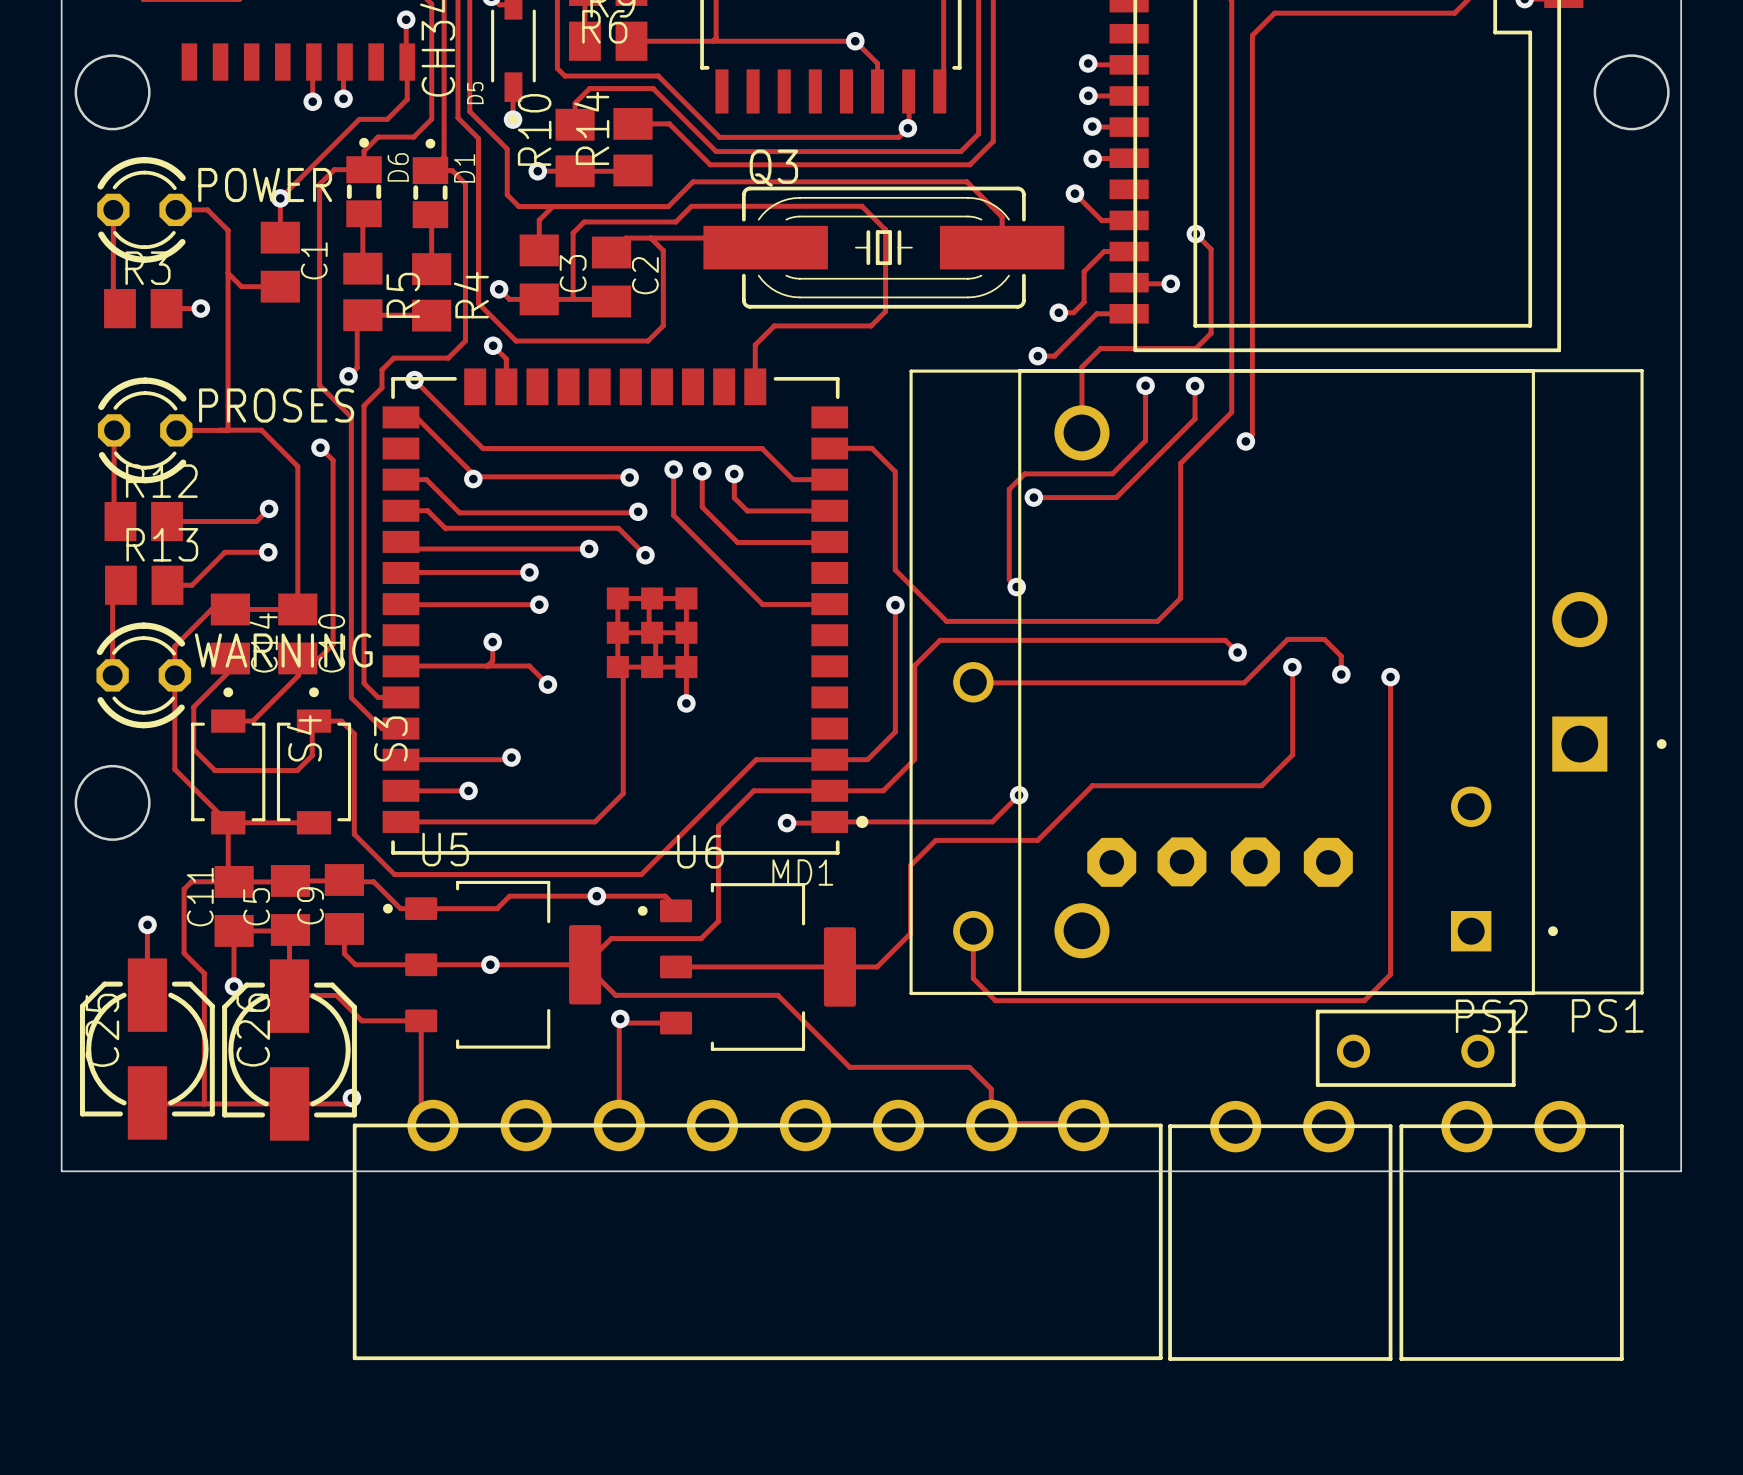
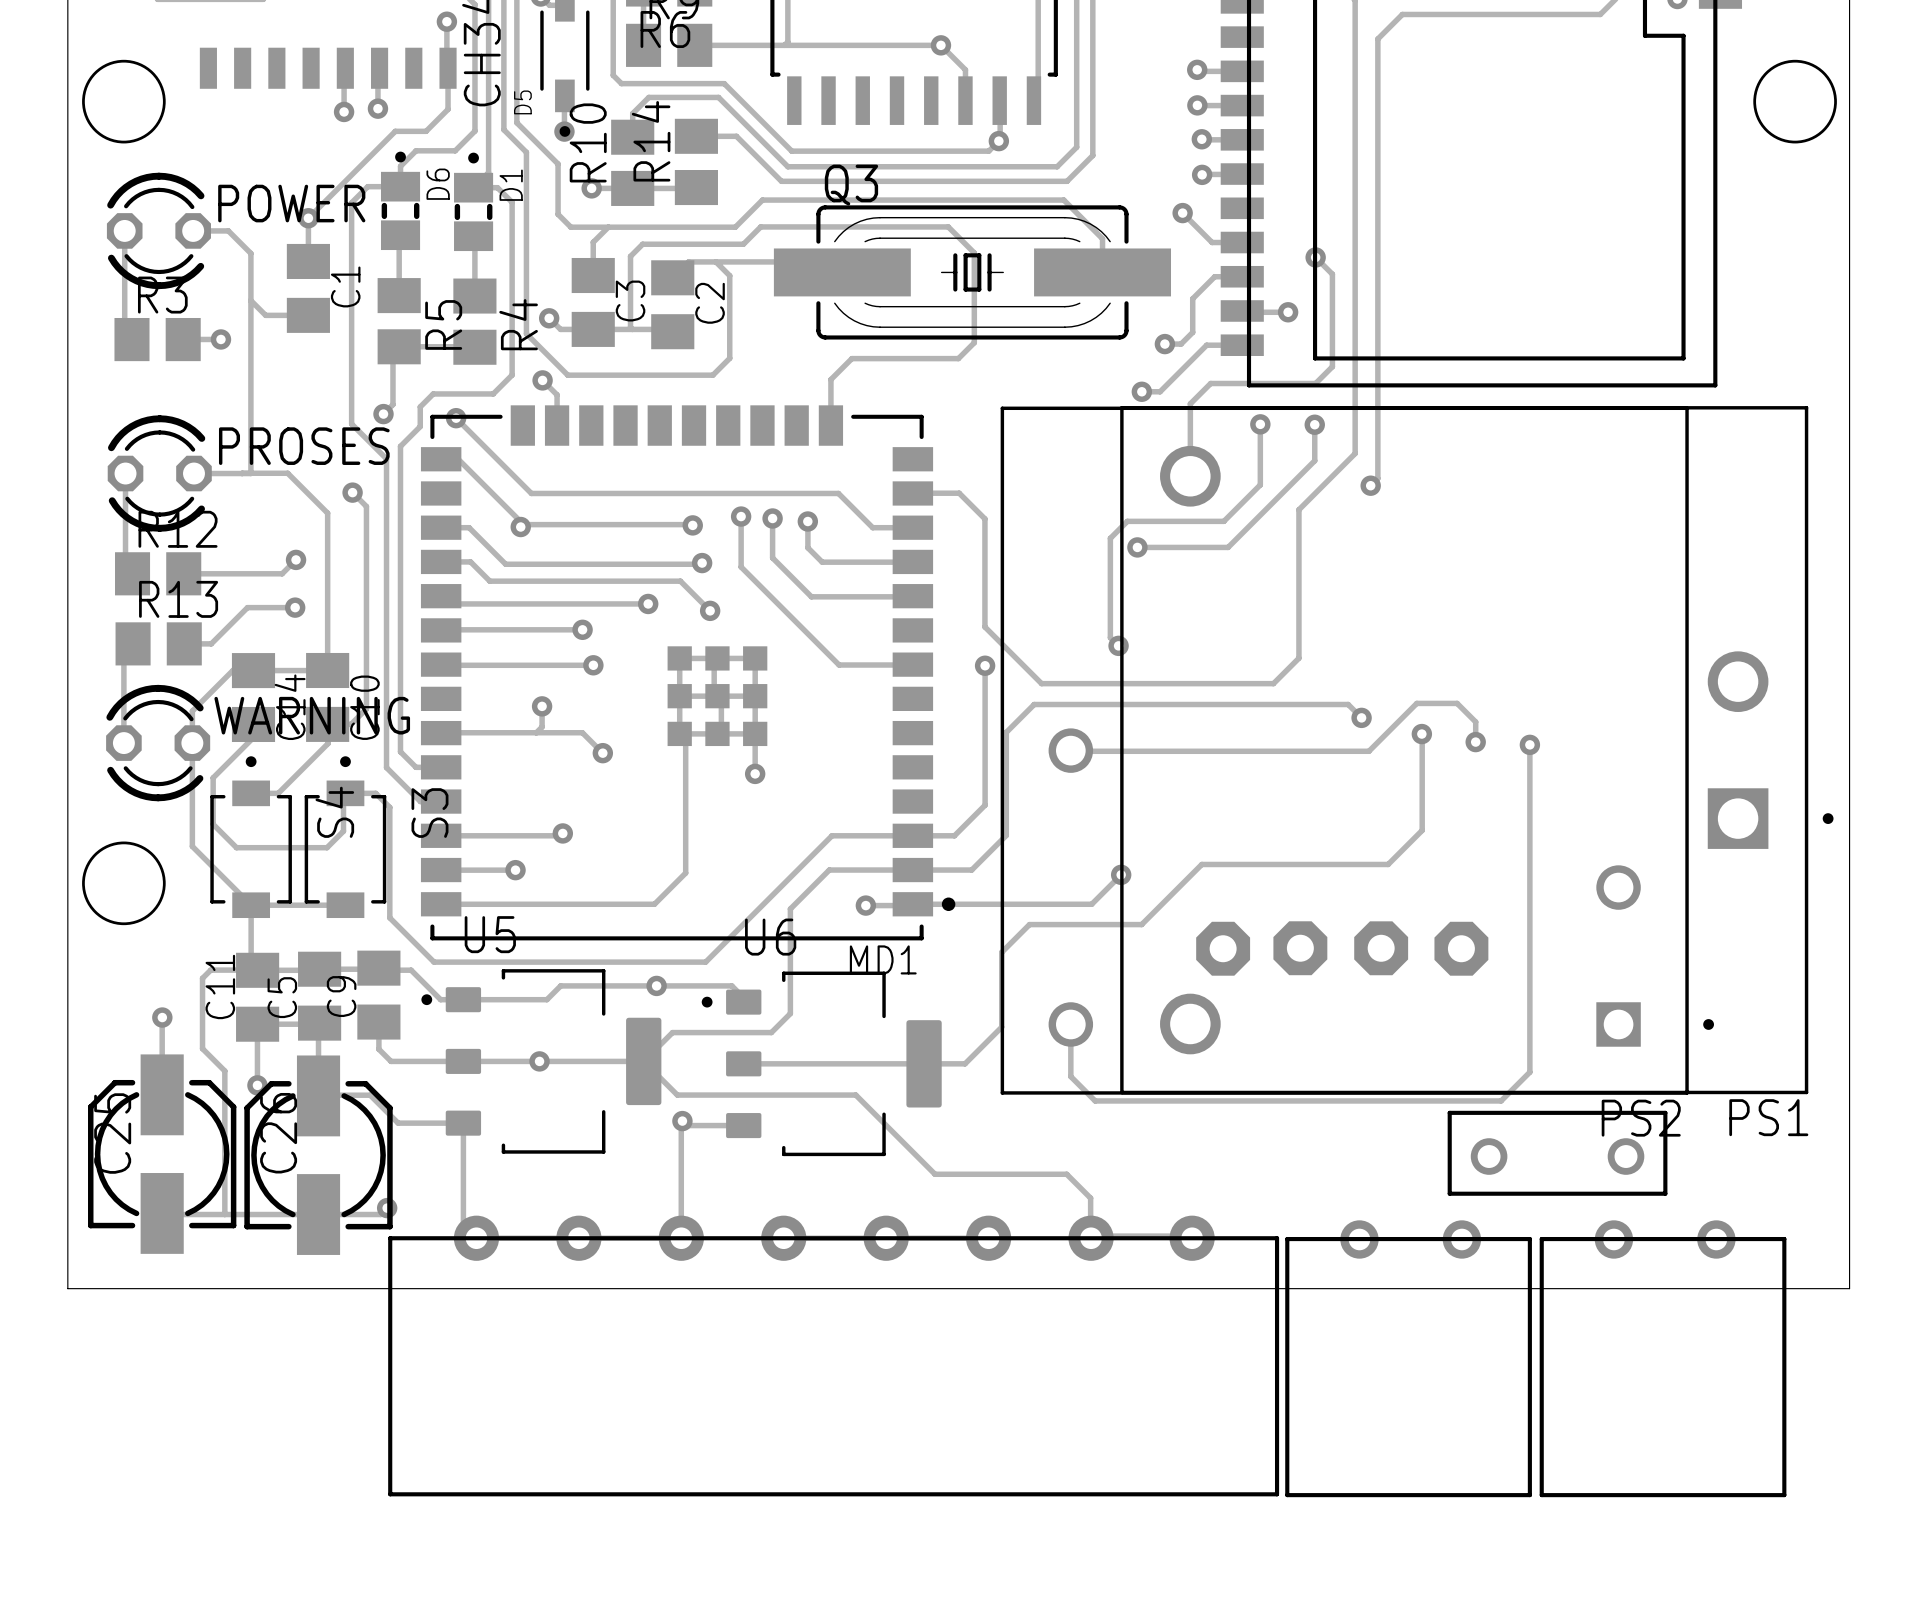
part footprint: [352, 1099, 1163, 1361] -> [388, 1215, 1280, 1497]
part footprint: [1168, 1100, 1393, 1361] -> [1285, 1220, 1532, 1498]
part footprint: [1399, 1100, 1624, 1361] -> [1539, 1220, 1787, 1498]

